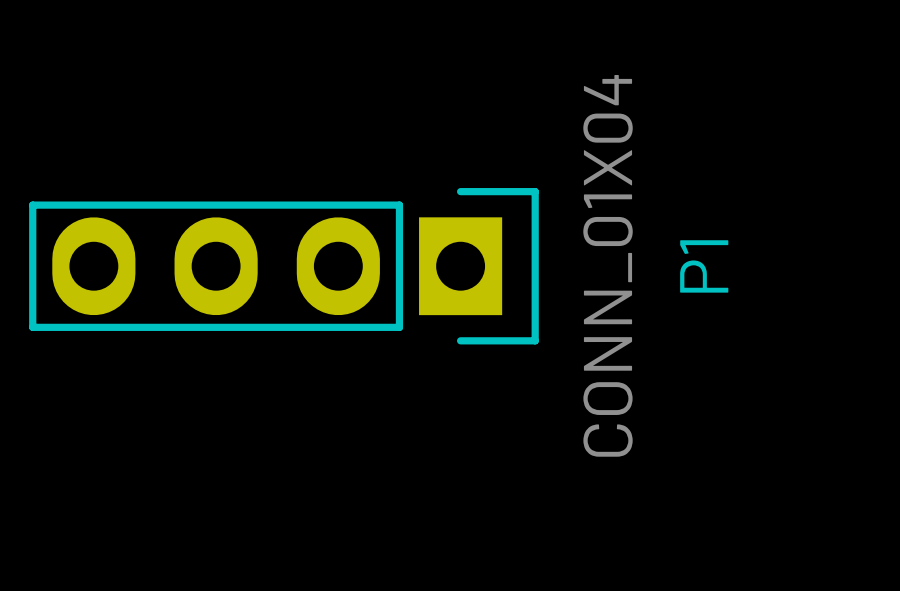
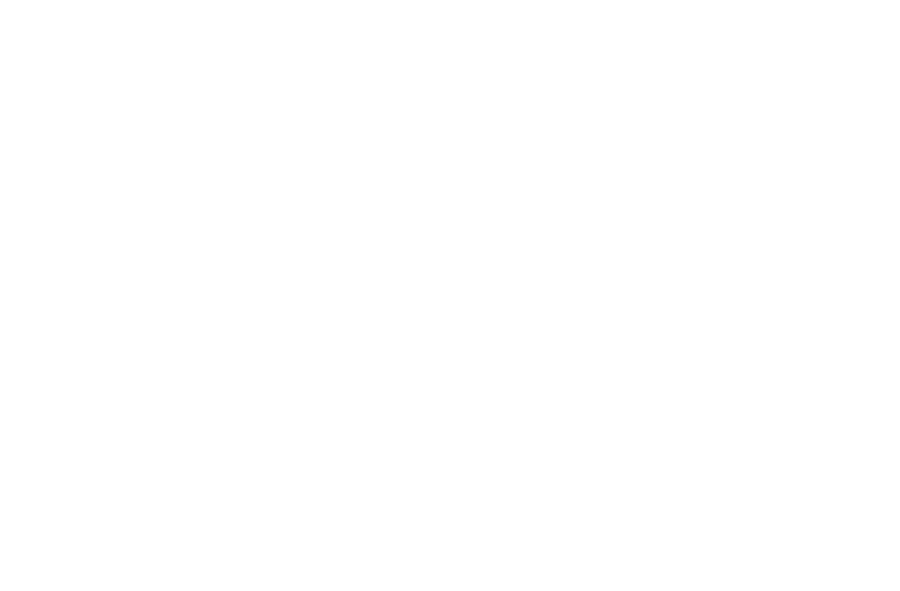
P1: CONN_01X04 (283, 266) -> none

